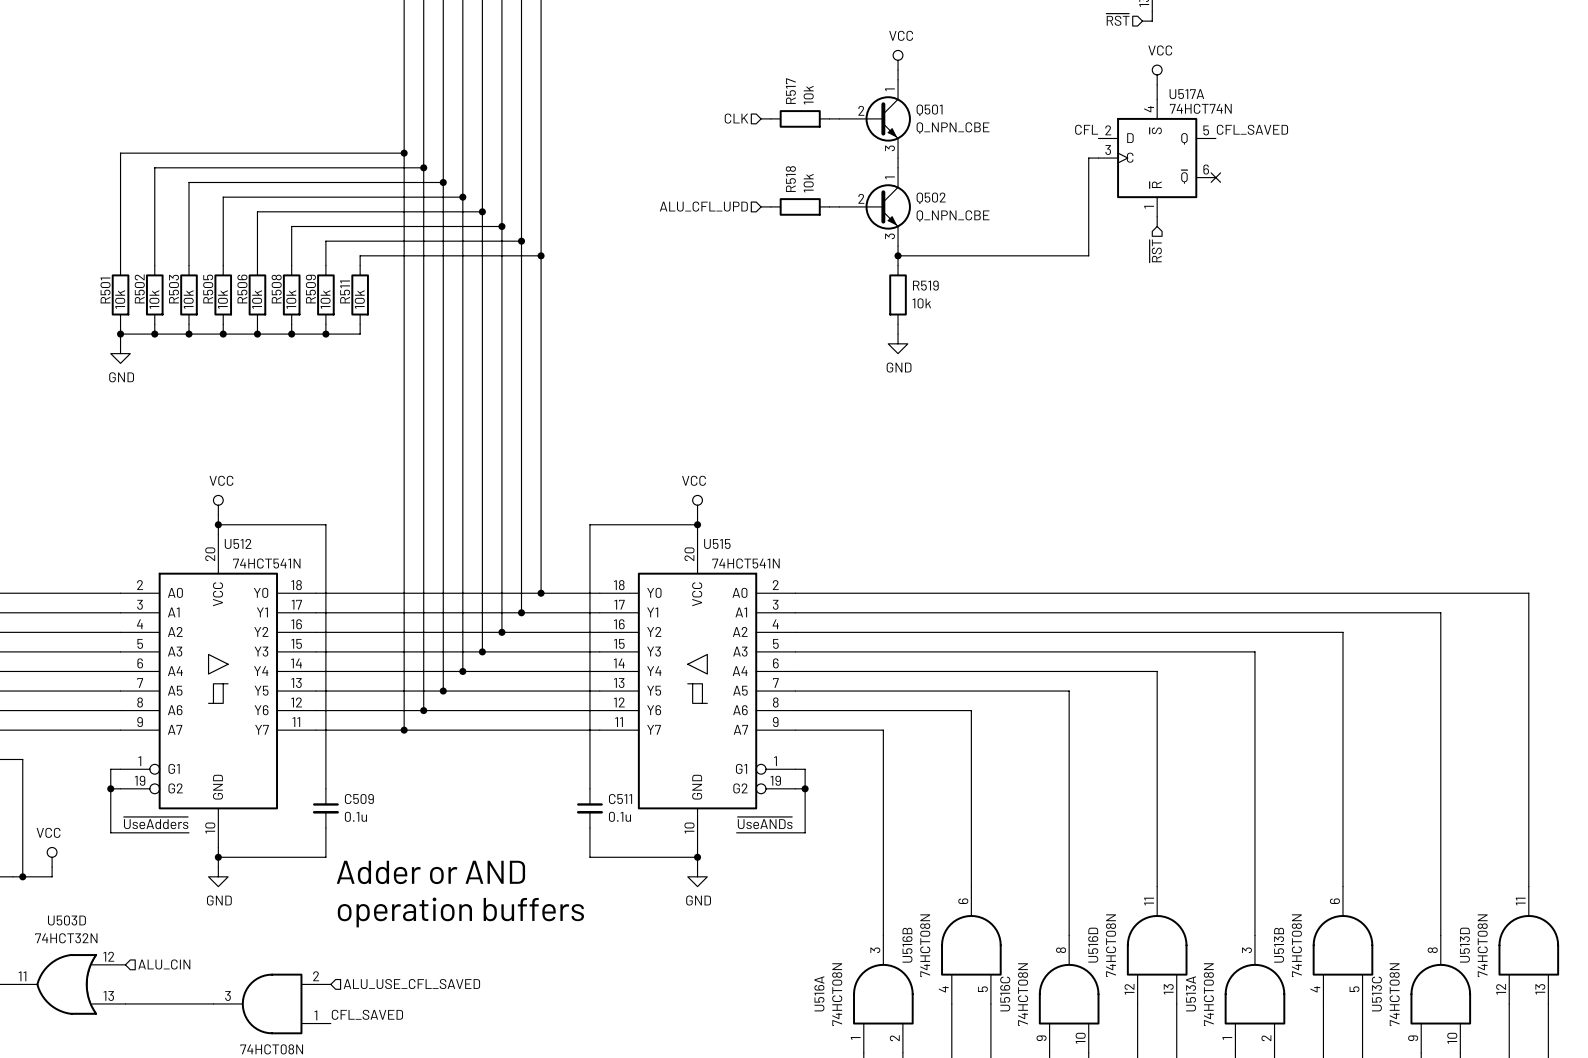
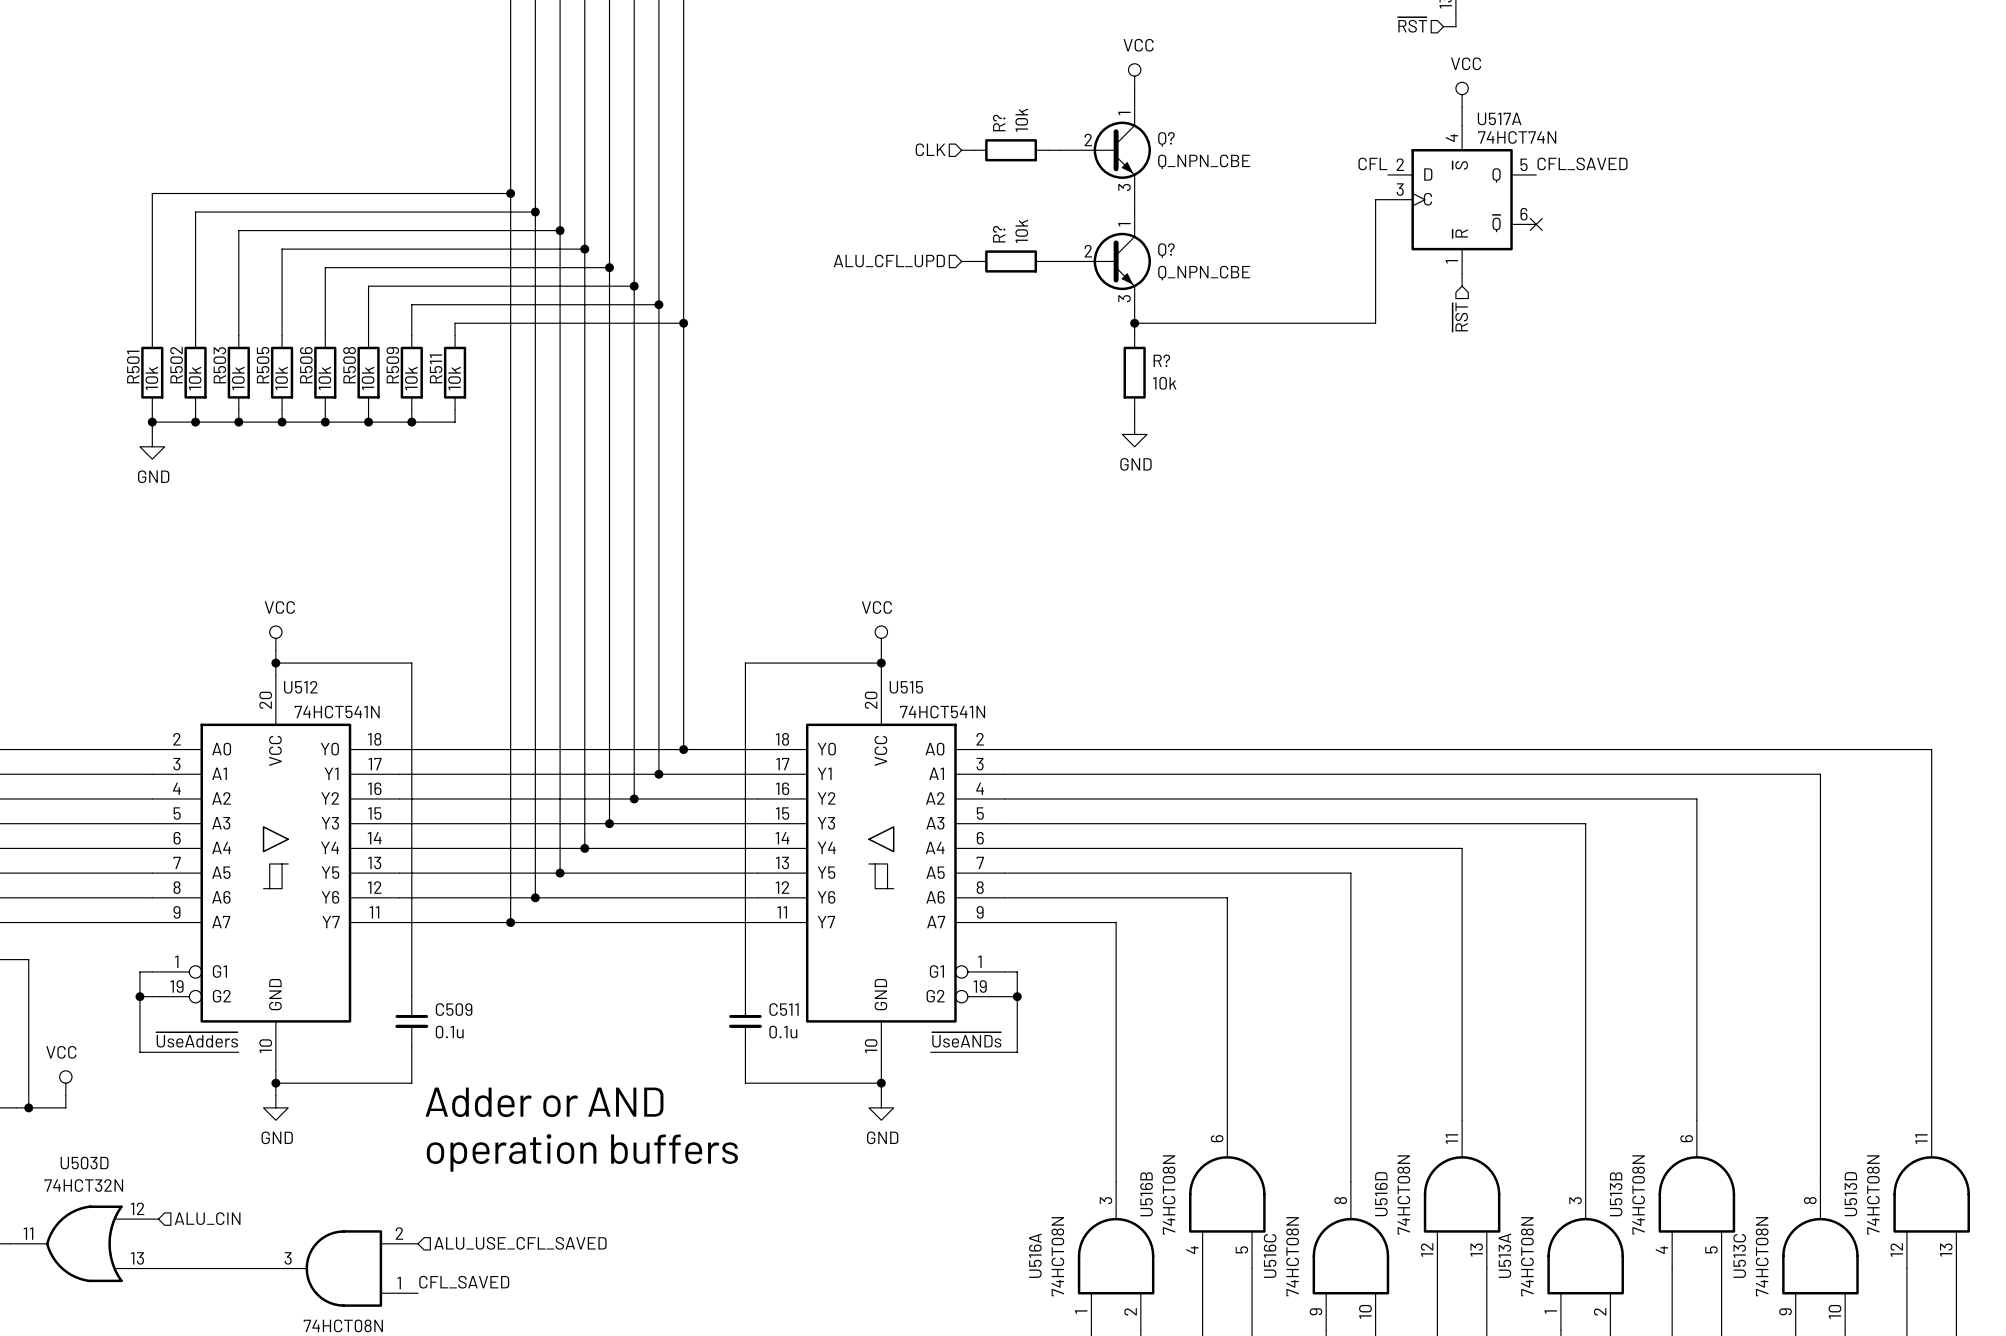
R517 name: R517 (790, 91) -> R? (999, 123)
Q501 name: Q501 (929, 110) -> Q? (1166, 139)
R518 name: R518 (790, 179) -> R? (999, 234)
Q502 name: Q502 (931, 198) -> Q? (1166, 250)
R519 name: R519 (925, 285) -> R? (1161, 360)

